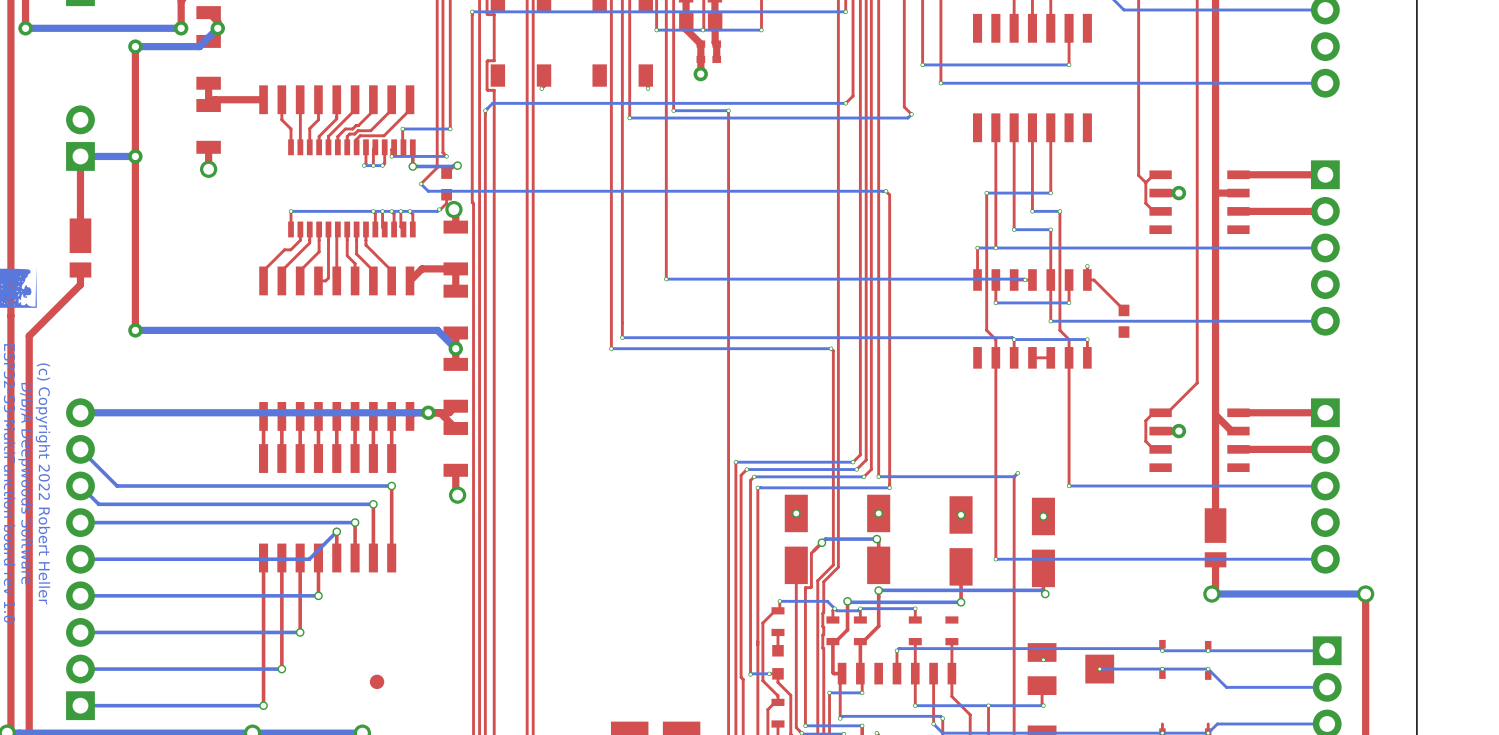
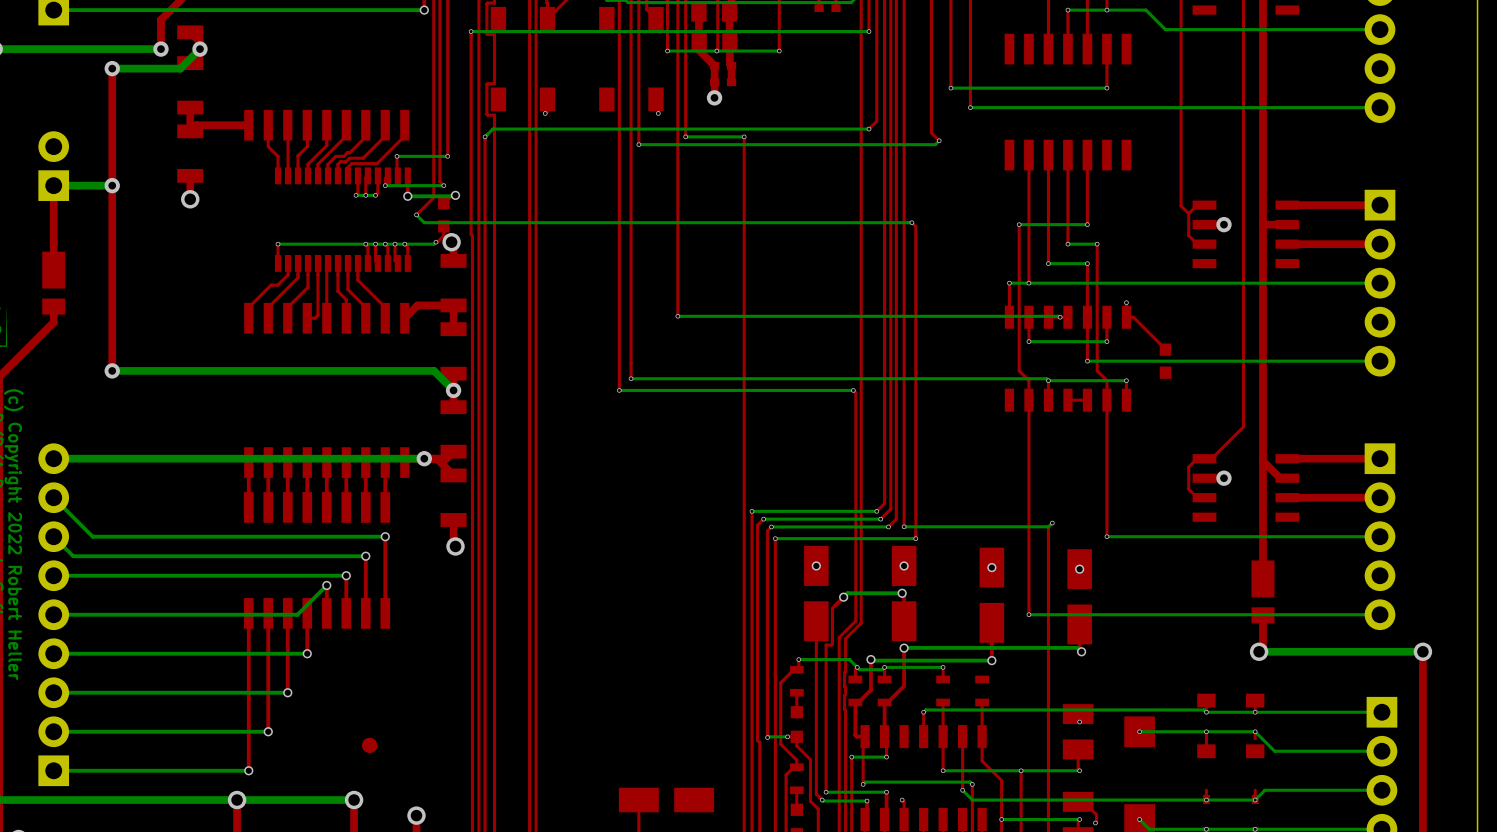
part footprint: [1159, 639, 1166, 679] -> [1197, 693, 1216, 759]
part footprint: [1204, 640, 1212, 680] -> [1245, 693, 1265, 759]
top track: none -> (1206, 737) (1206, 751)

